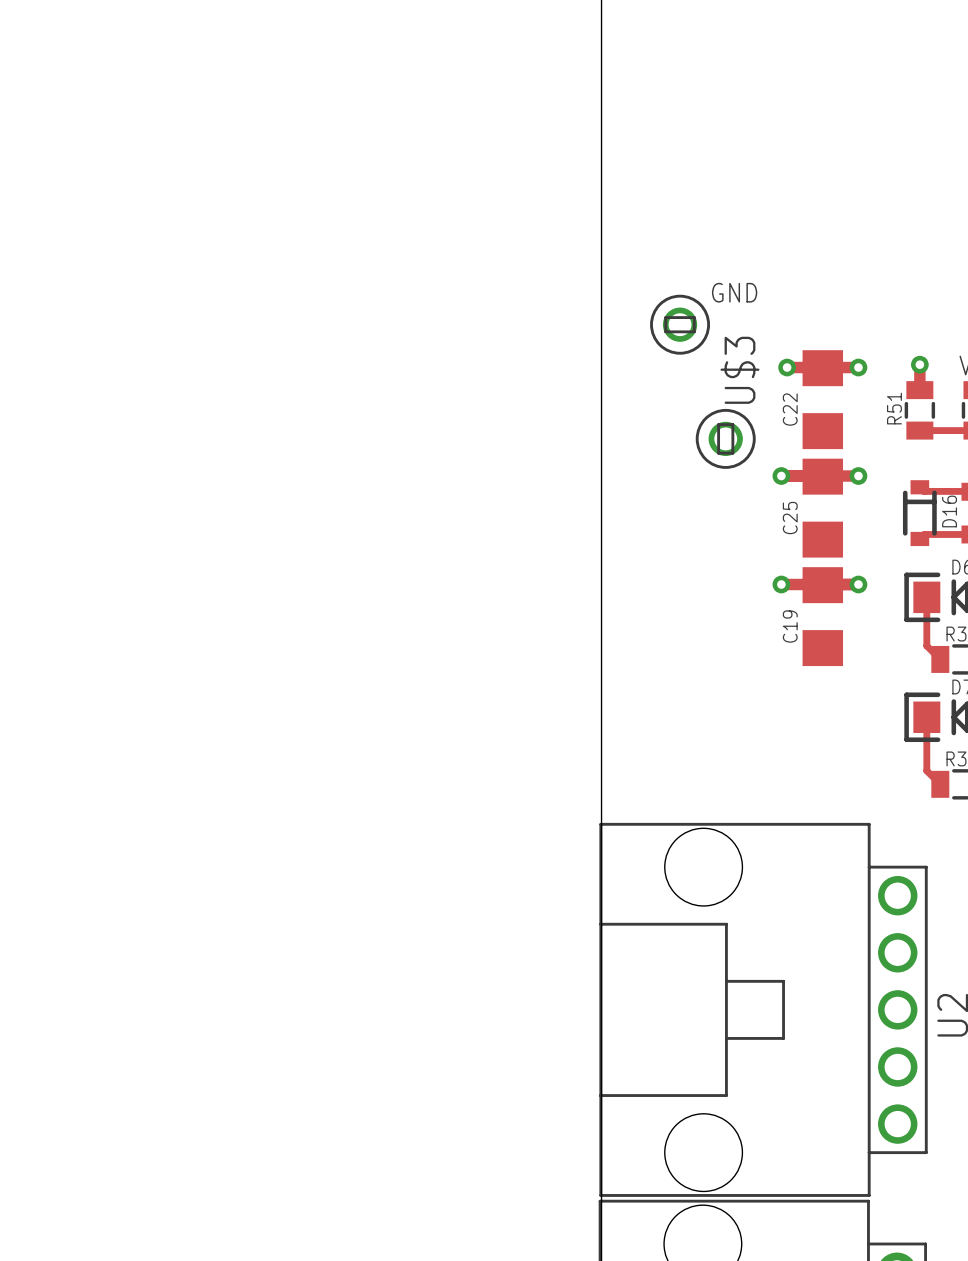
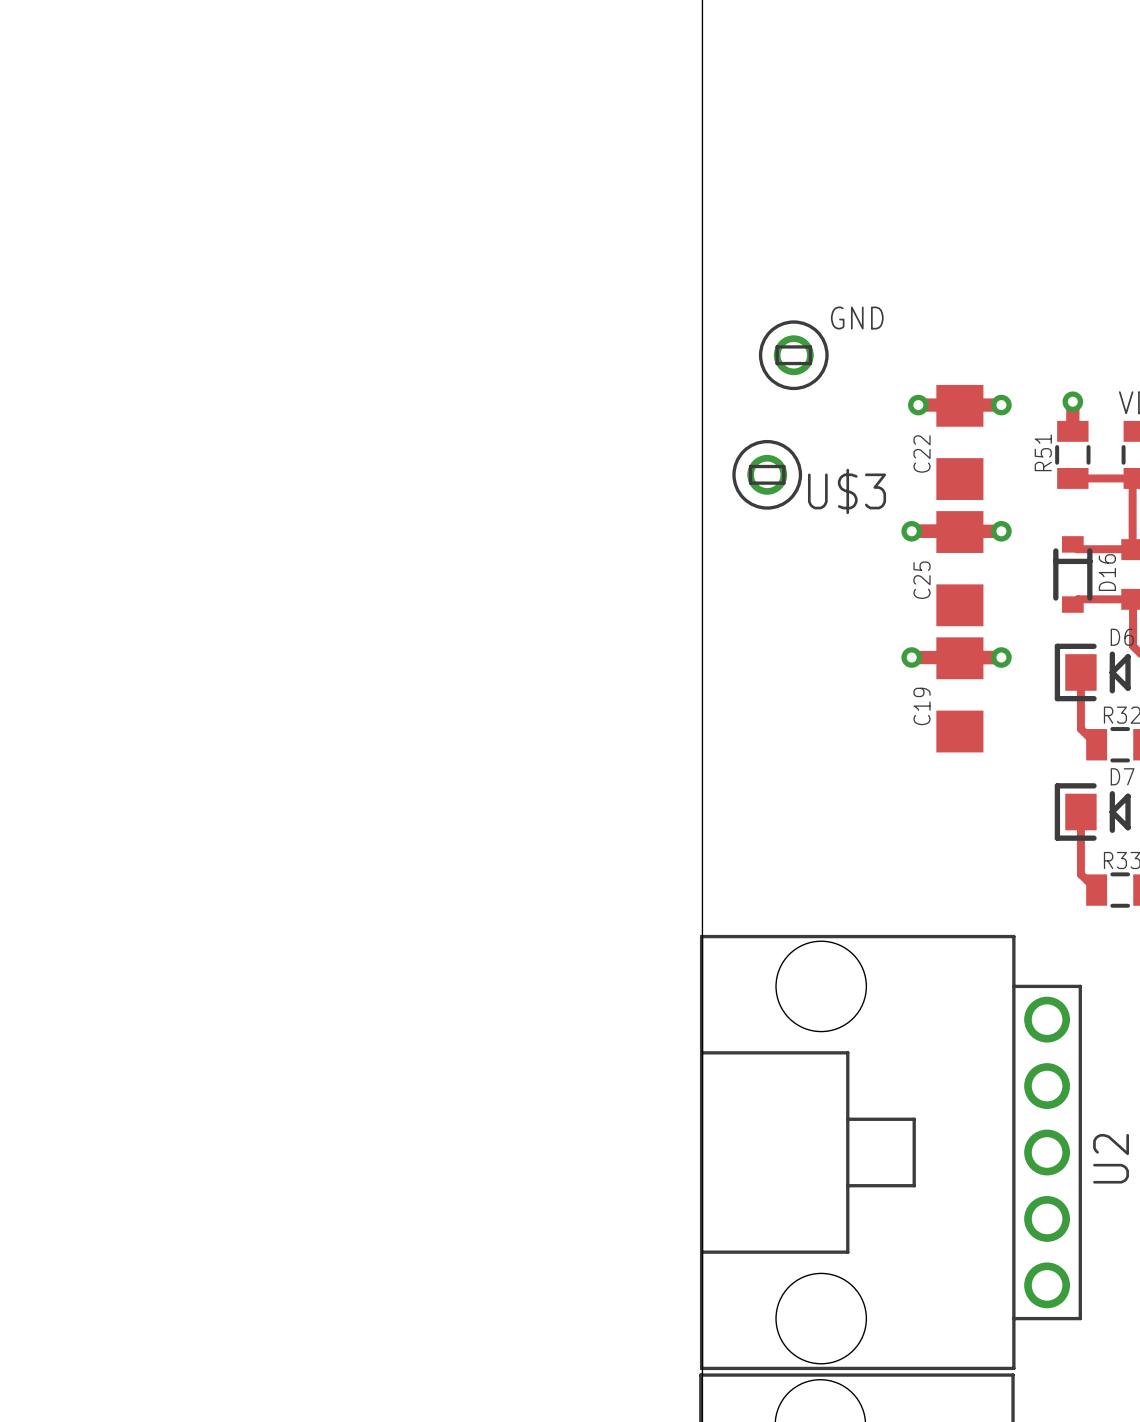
U$3 rotation: 0° (725, 438) -> 90° clockwise (767, 474)
U$3 position: (725, 438) -> (767, 474)

